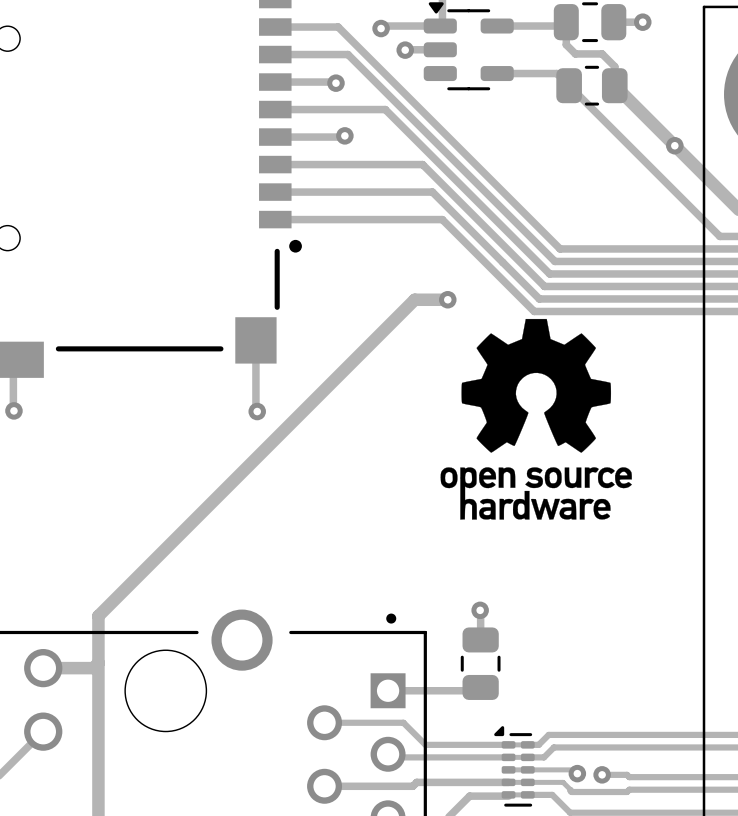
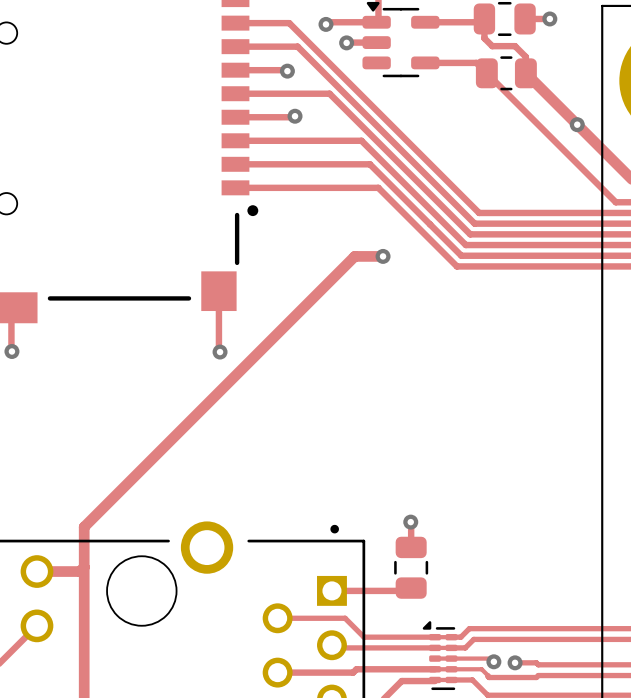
drawing: [440, 318, 632, 520] -> none

